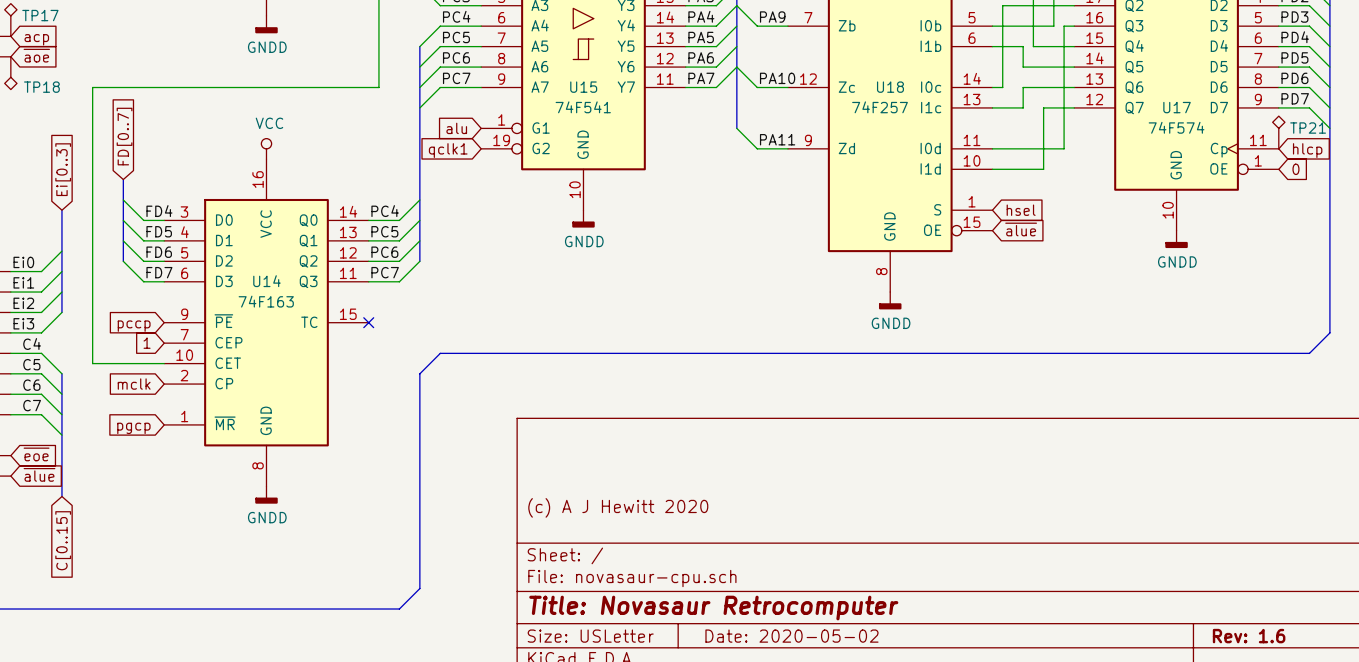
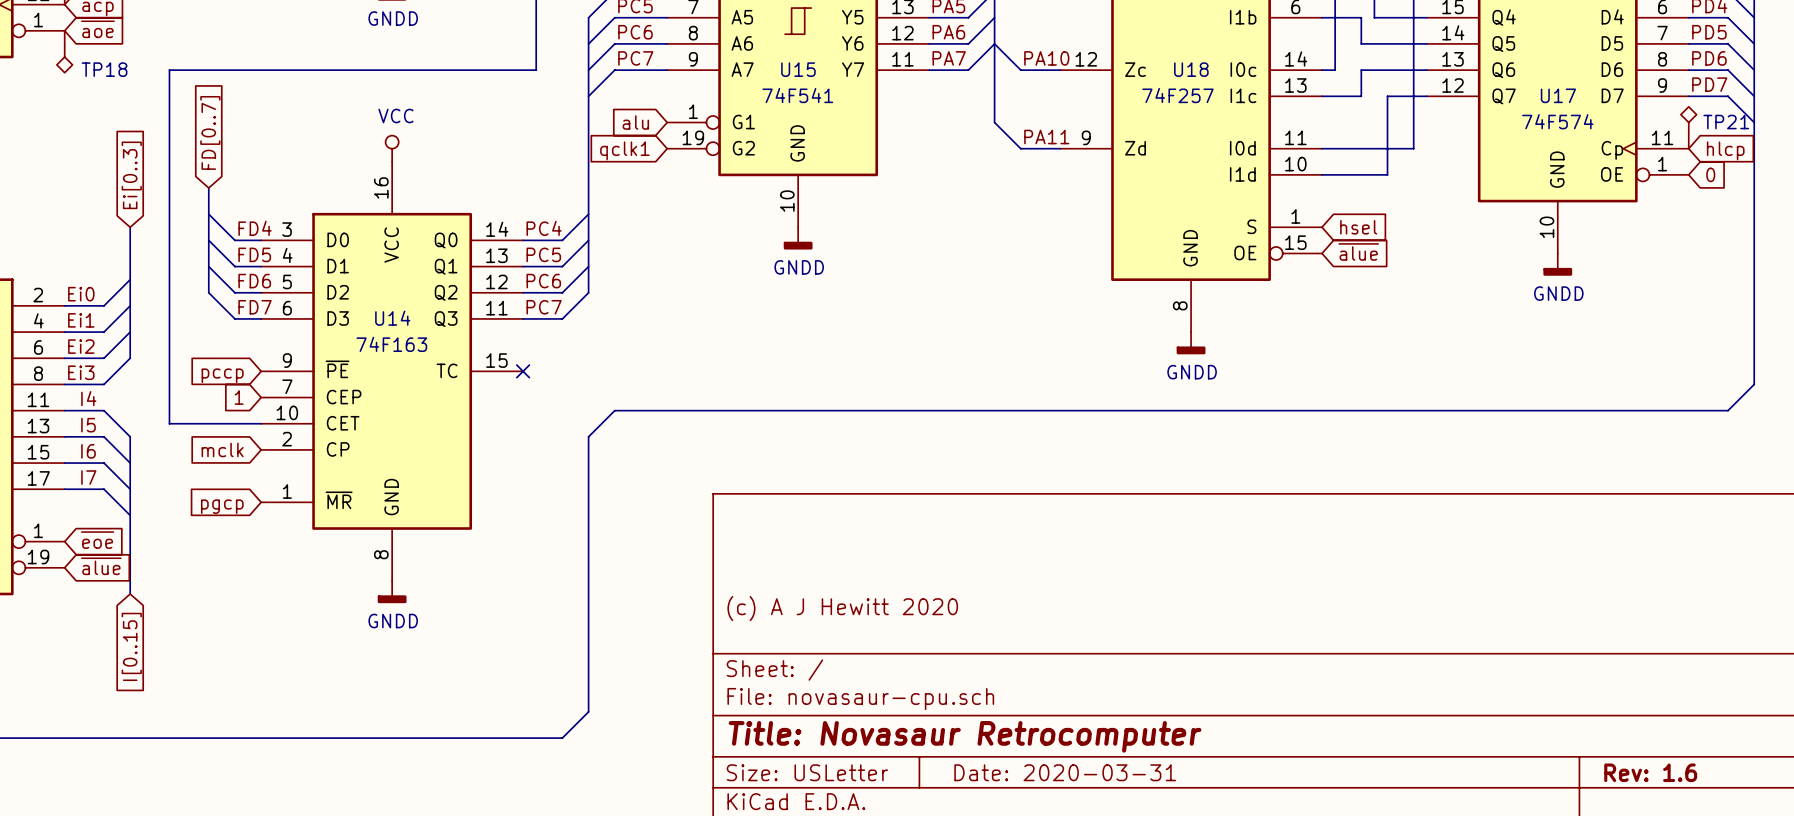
label: C4 (32, 344) -> I4 (88, 398)
label: C5 (31, 364) -> I5 (88, 425)
label: C6 (31, 385) -> I6 (88, 451)
label: C7 (32, 405) -> I7 (88, 477)
global label: C[0..15] (63, 540) -> I[0..15] (131, 646)
title block: Date: 2020-05-02 (791, 636) -> Date: 2020-03-31 (1065, 772)

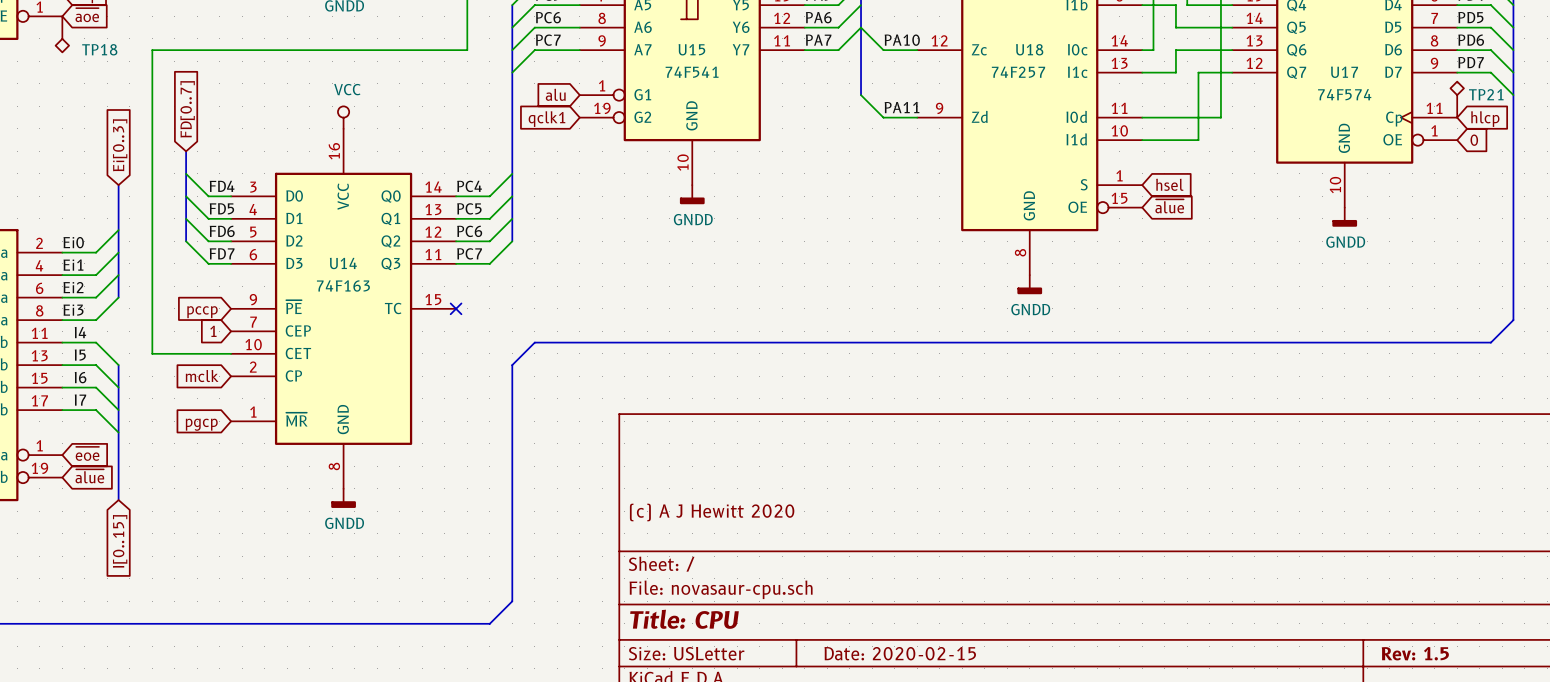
title block: Title: Novasaur Retrocomputer (965, 736) -> Title: CPU (684, 619)
title block: Date: 2020-03-31 (1065, 772) -> Date: 2020-02-15 (900, 653)
title block: Rev: 1.6 (1650, 772) -> Rev: 1.5 (1415, 653)

